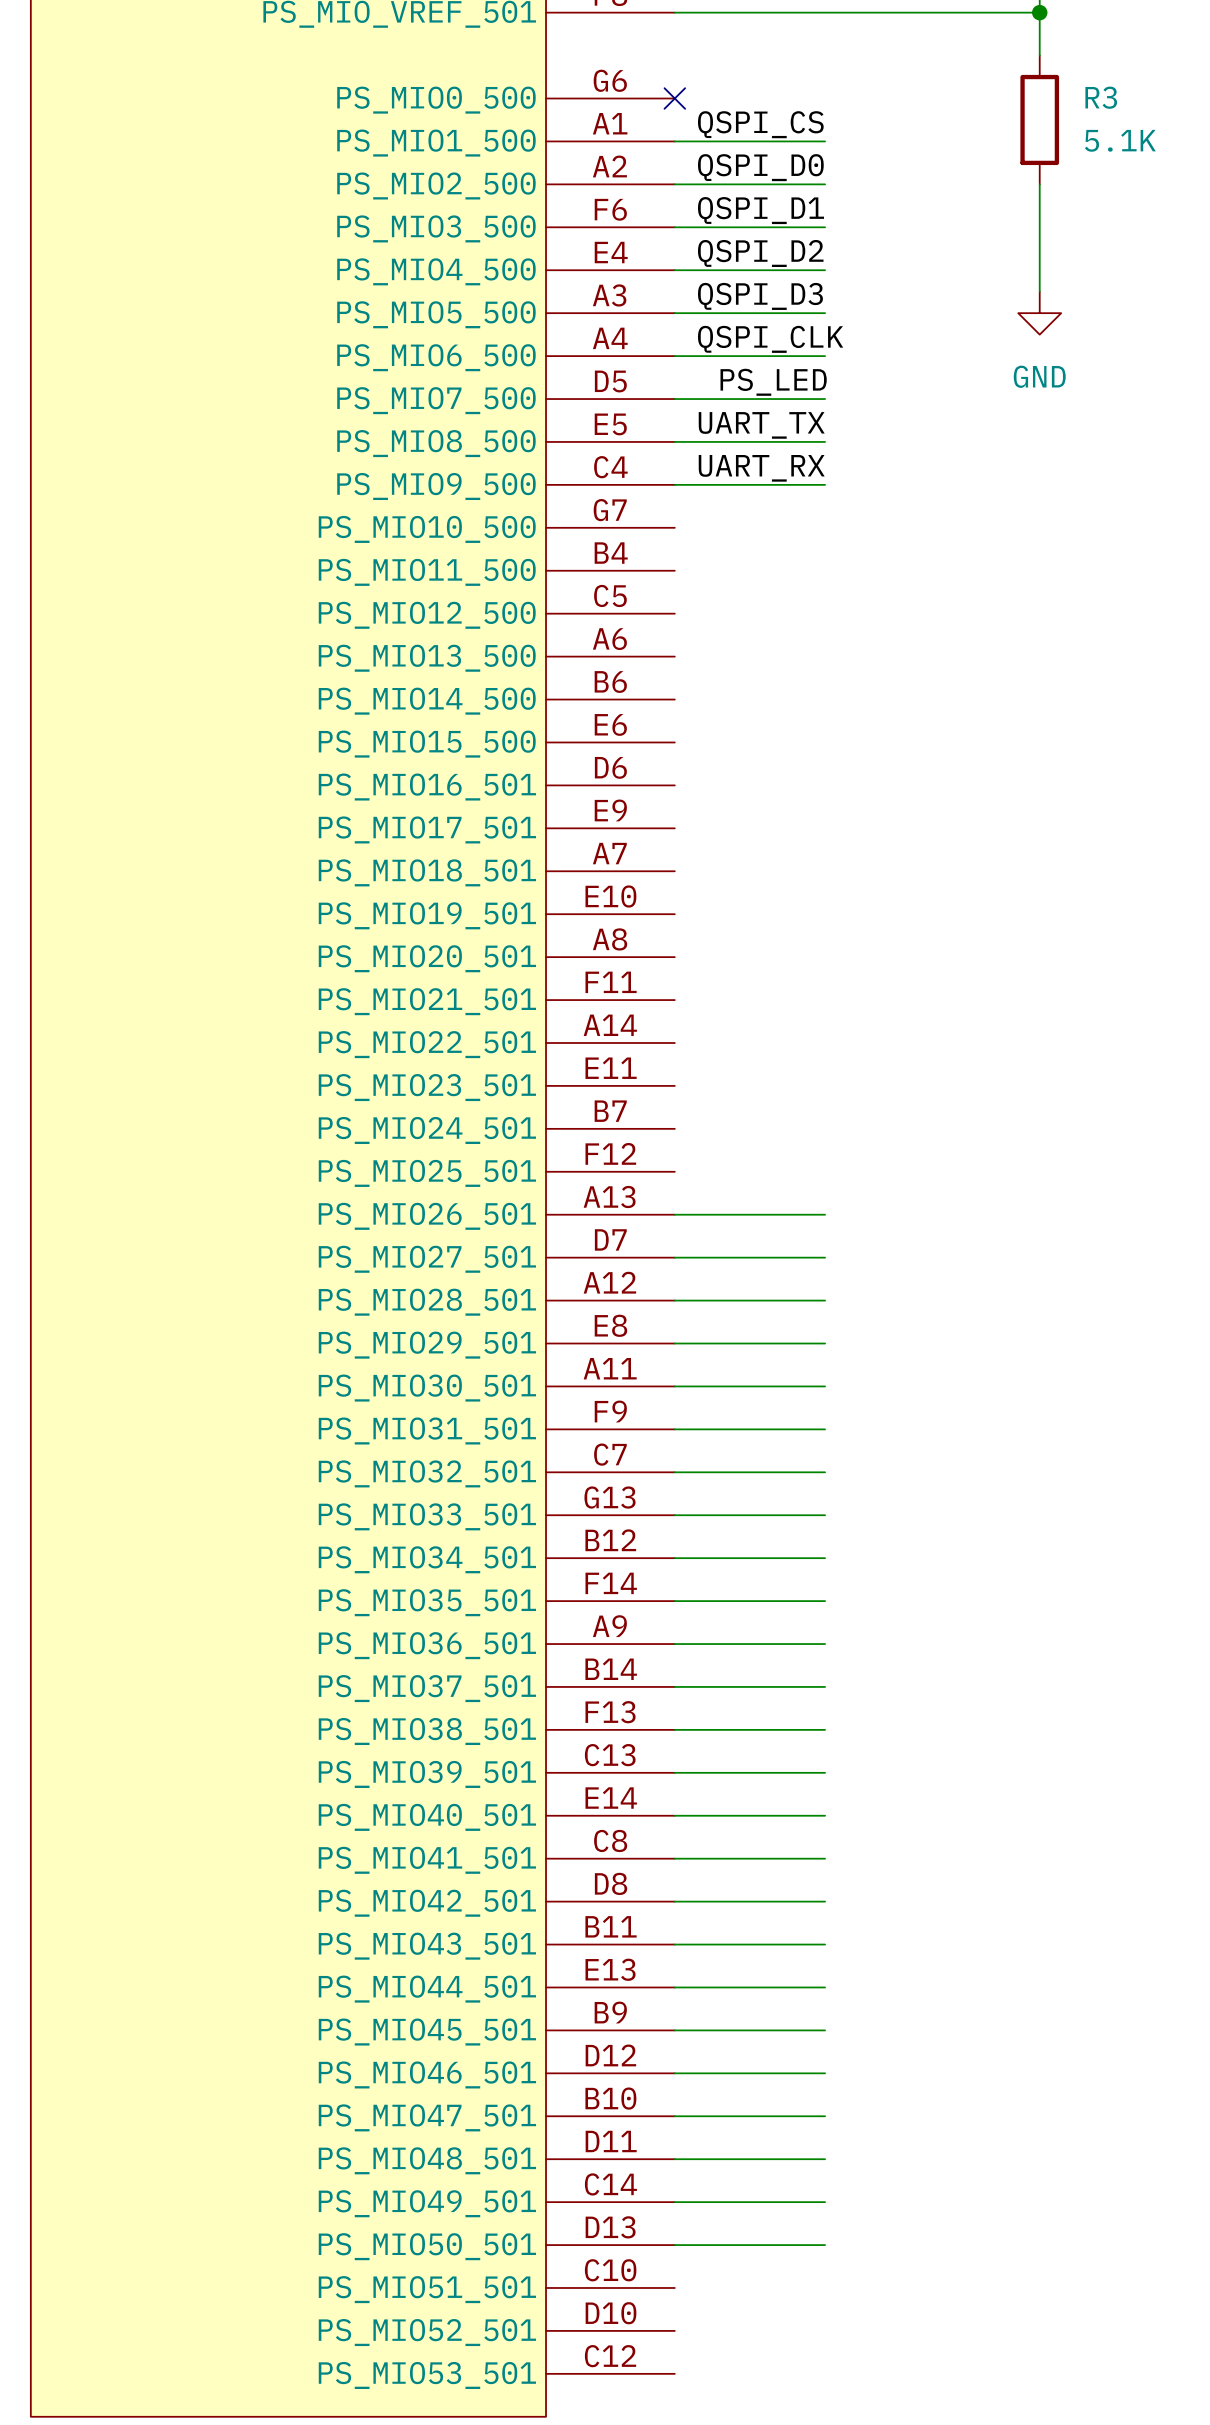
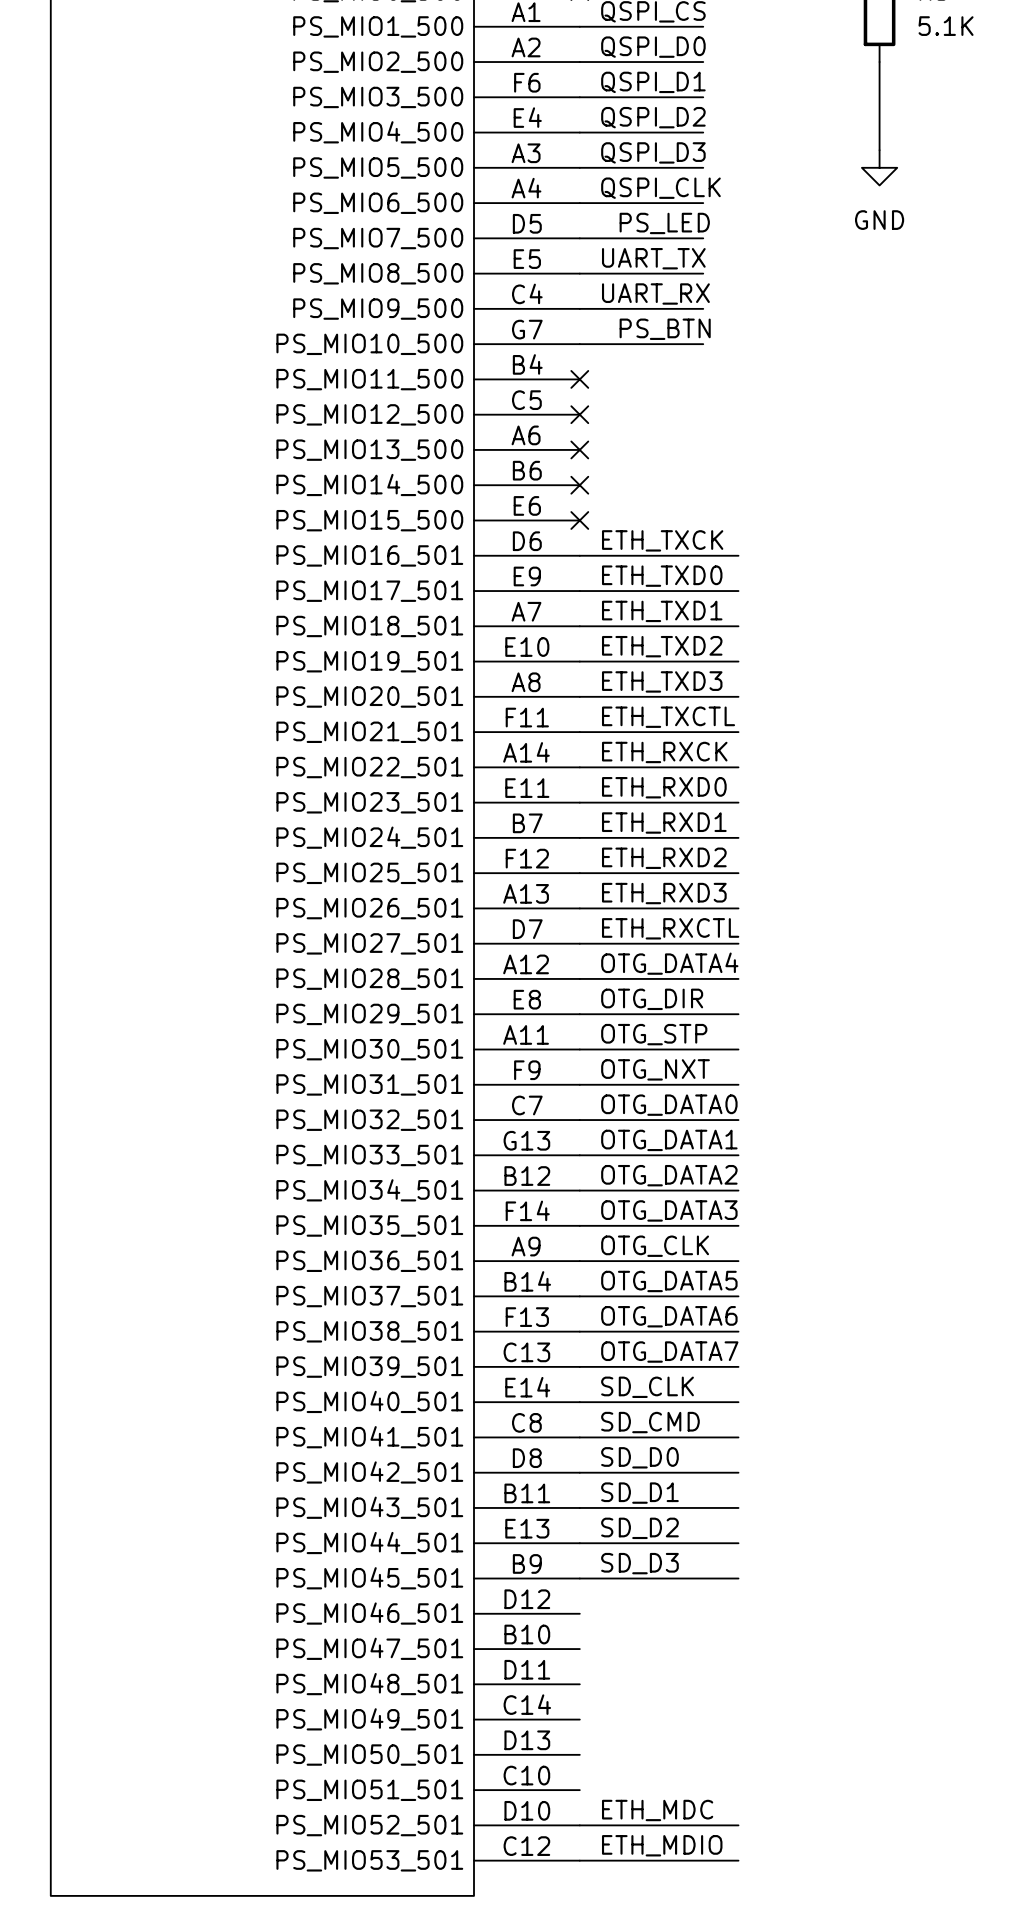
label: none -> PS_BTN (665, 329)
wire: none -> (579, 344) (703, 344)
no-connect mark: none -> (579, 379)
no-connect mark: none -> (579, 414)
no-connect mark: none -> (579, 449)
no-connect mark: none -> (579, 485)
no-connect mark: none -> (579, 520)
label: none -> ETH_TXCK (662, 540)
wire: none -> (579, 555) (738, 555)
label: none -> ETH_TXD0 (662, 576)
wire: none -> (579, 591) (738, 591)
label: none -> ETH_TXD1 (662, 611)
wire: none -> (579, 626) (738, 626)
label: none -> ETH_TXD2 (662, 646)
wire: none -> (579, 661) (738, 661)
label: none -> ETH_TXD3 (662, 681)
wire: none -> (579, 696) (738, 696)
label: none -> ETH_TXCTL (668, 717)
wire: none -> (579, 732) (738, 732)
label: none -> ETH_RXCK (664, 752)
wire: none -> (579, 767) (738, 767)
label: none -> ETH_RXD0 (664, 787)
wire: none -> (579, 802) (738, 802)
label: none -> ETH_RXD1 (664, 823)
wire: none -> (579, 837) (738, 837)
label: none -> ETH_RXD2 (664, 858)
wire: none -> (579, 873) (738, 873)
label: none -> ETH_RXD3 (664, 893)
wire: none -> (703, 908) (738, 908)
label: none -> ETH_RXCTL (670, 928)
wire: none -> (703, 943) (738, 943)
label: none -> OTG_DATA4 (669, 963)
wire: none -> (703, 978) (738, 978)
label: none -> OTG_DIR (652, 999)
wire: none -> (703, 1014) (738, 1014)
label: none -> OTG_STP (654, 1034)
wire: none -> (703, 1049) (738, 1049)
label: none -> OTG_NXT (655, 1069)
wire: none -> (703, 1084) (738, 1084)
label: none -> OTG_DATA0 (669, 1105)
wire: none -> (703, 1120) (738, 1120)
label: none -> OTG_DATA1 (669, 1140)
wire: none -> (703, 1155) (738, 1155)
label: none -> OTG_DATA2 (669, 1175)
wire: none -> (703, 1190) (738, 1190)
label: none -> OTG_DATA3 (669, 1210)
wire: none -> (703, 1225) (738, 1225)
label: none -> OTG_CLK (655, 1246)
wire: none -> (703, 1261) (738, 1261)
label: none -> OTG_DATA5 (669, 1281)
wire: none -> (703, 1296) (738, 1296)
label: none -> OTG_DATA6 (669, 1316)
wire: none -> (703, 1331) (738, 1331)
label: none -> OTG_DATA7 (669, 1352)
wire: none -> (703, 1366) (738, 1366)
label: none -> SD_CLK (647, 1387)
wire: none -> (703, 1402) (738, 1402)
label: none -> SD_CMD (650, 1422)
wire: none -> (703, 1437) (738, 1437)
label: none -> SD_D0 (639, 1457)
wire: none -> (703, 1472) (738, 1472)
label: none -> SD_D1 (639, 1493)
wire: none -> (703, 1507) (738, 1507)
label: none -> SD_D2 (639, 1528)
wire: none -> (703, 1543) (738, 1543)
label: none -> SD_D3 (639, 1563)
wire: none -> (703, 1578) (738, 1578)
wire: (674, 2073) (825, 2073) -> none
wire: (674, 2116) (825, 2116) -> none
wire: (674, 2159) (825, 2159) -> none
wire: (674, 2202) (825, 2202) -> none
wire: (674, 2245) (825, 2245) -> none
label: none -> ETH_MDC (657, 1810)
wire: none -> (579, 1825) (738, 1825)
label: none -> ETH_MDIO (662, 1845)
wire: none -> (579, 1860) (738, 1860)

